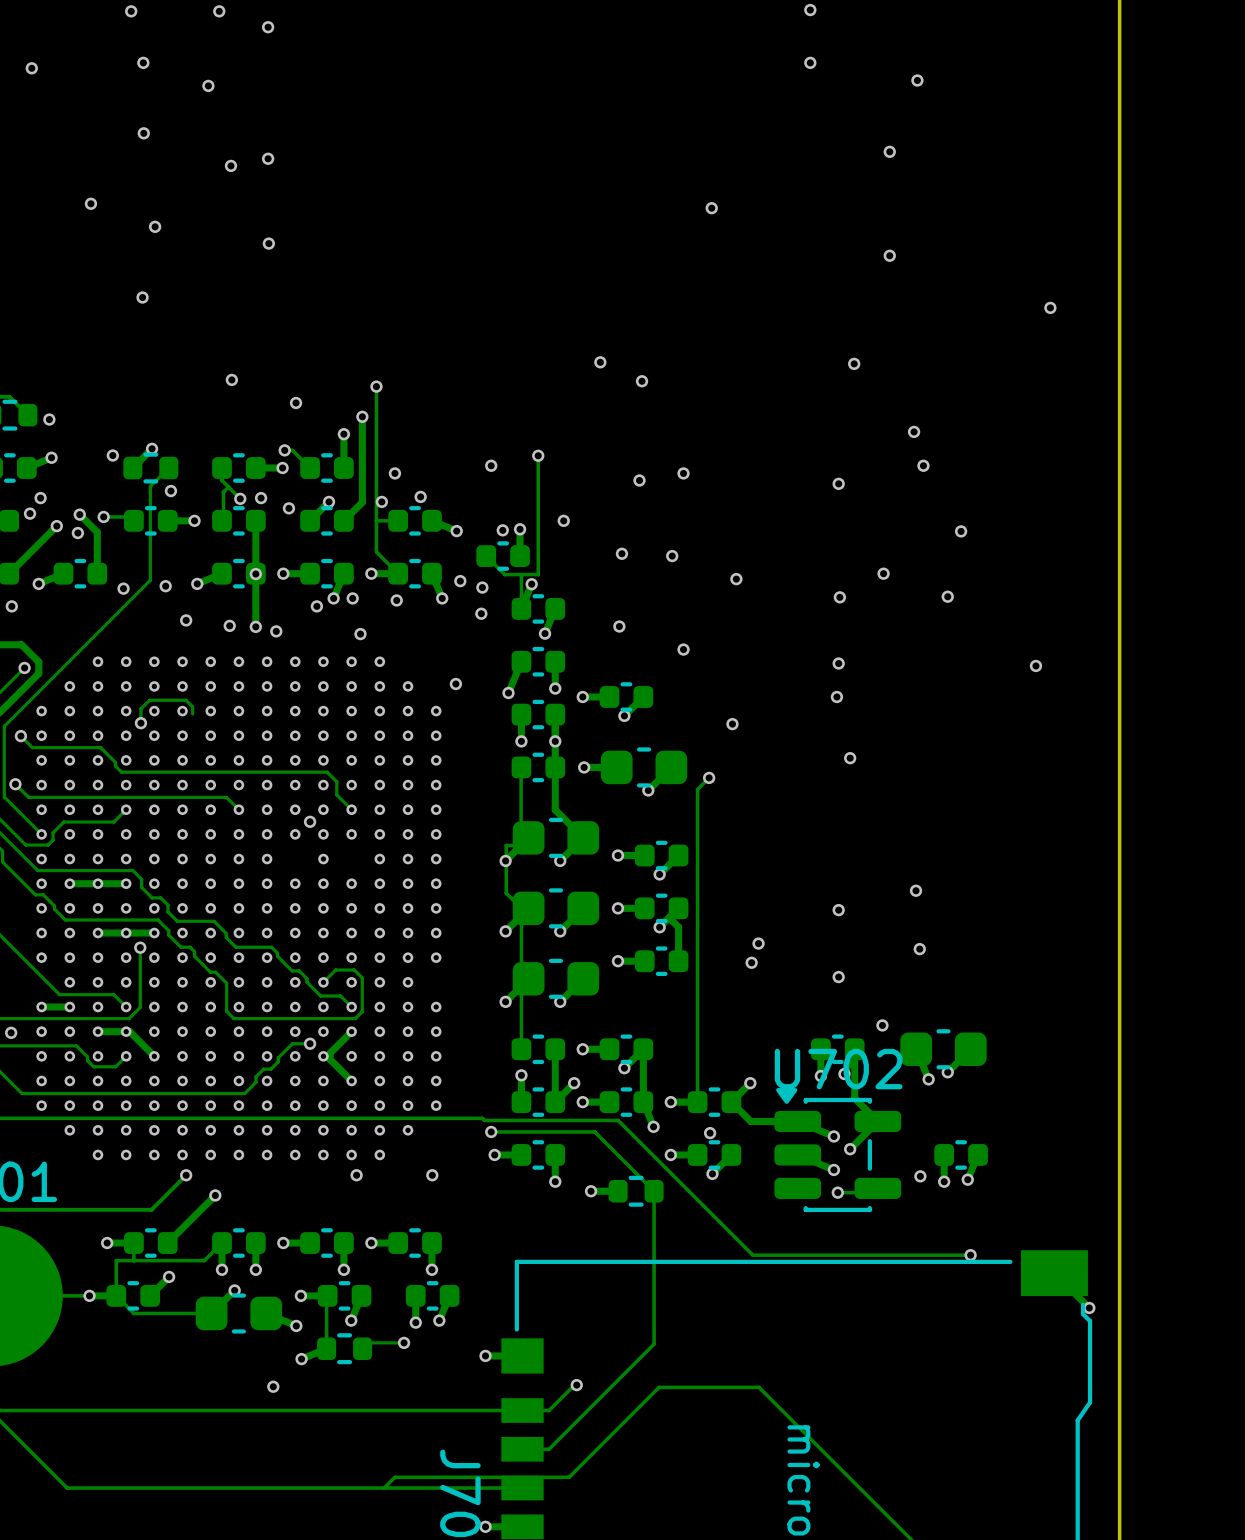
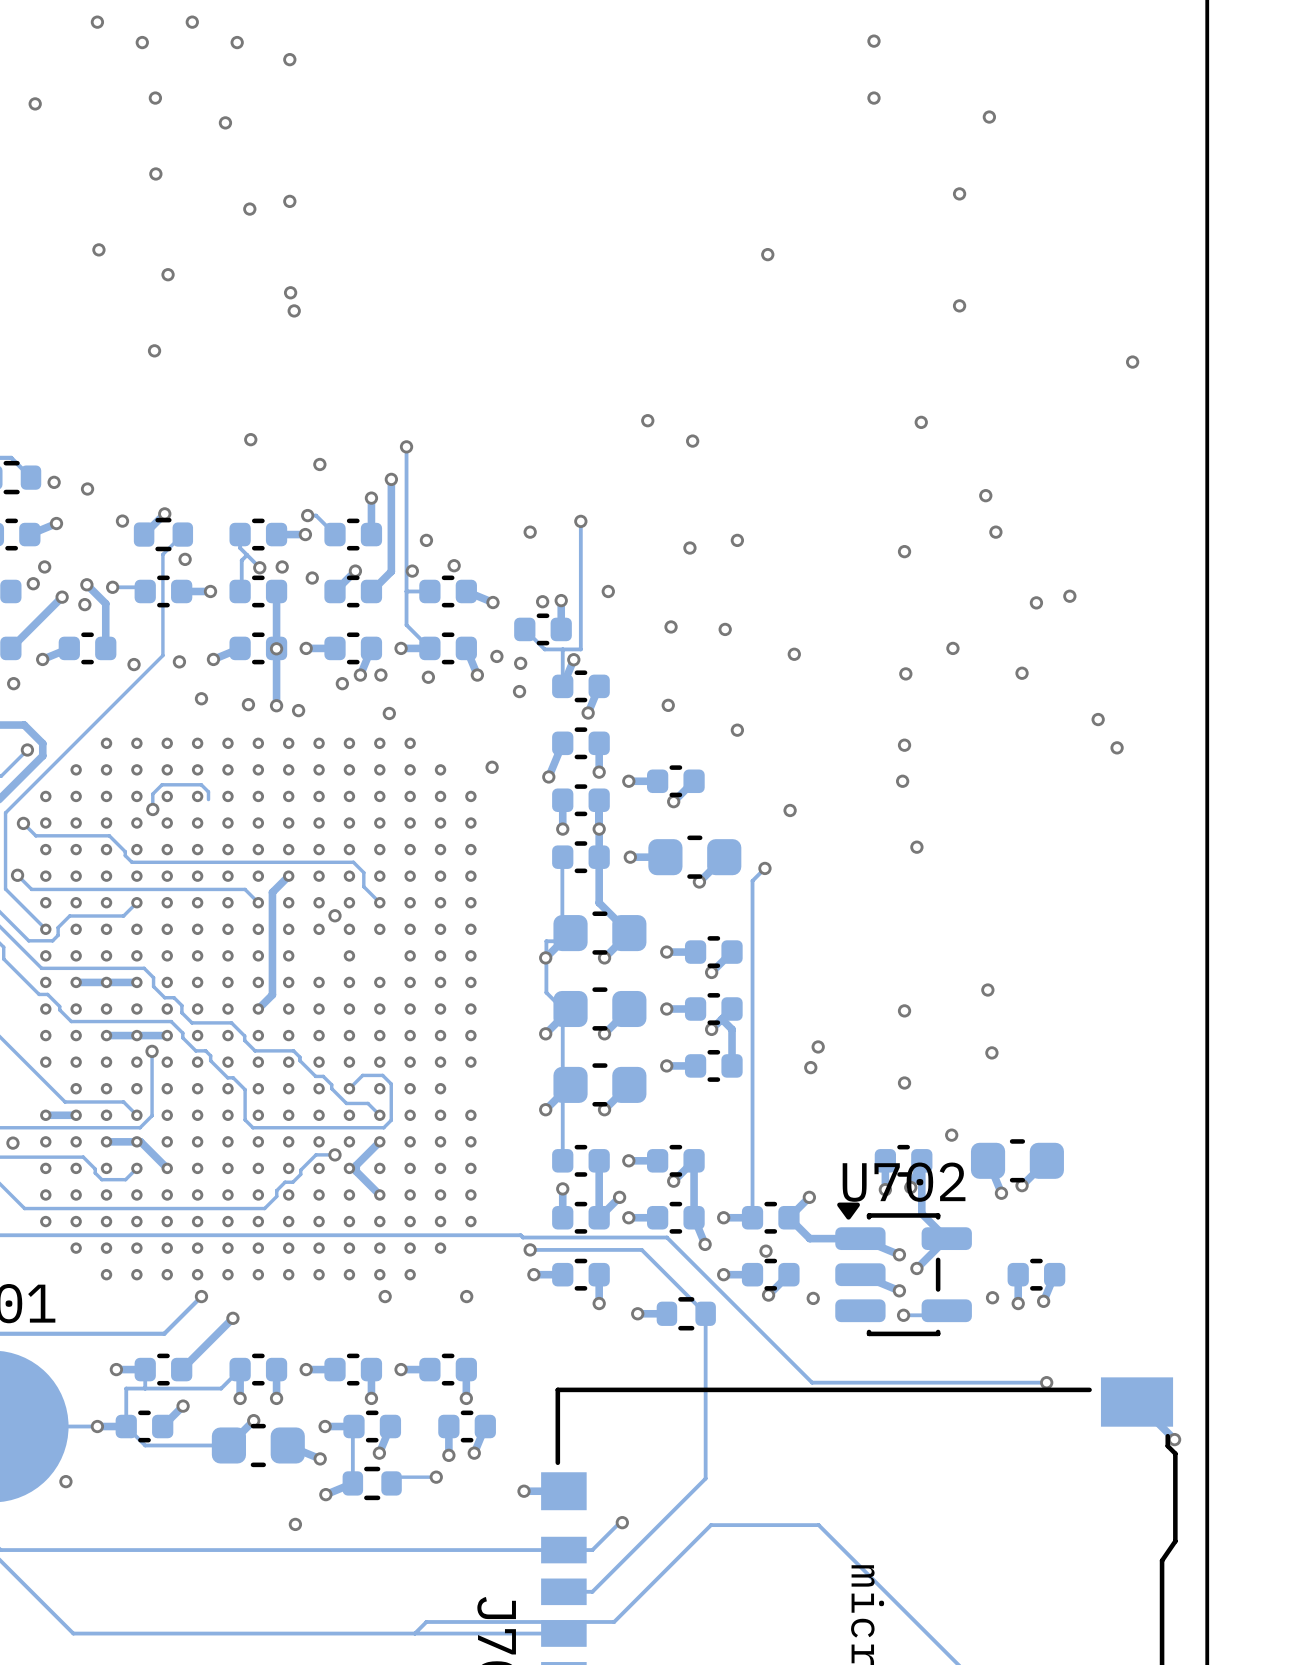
via: none -> (294, 310)
via: none -> (87, 489)
via: none -> (1069, 596)
via: none -> (1098, 719)
track: none -> (288, 876) (272, 892) (272, 994) (258, 1009)
via: none -> (813, 1298)
via: none -> (65, 1481)

